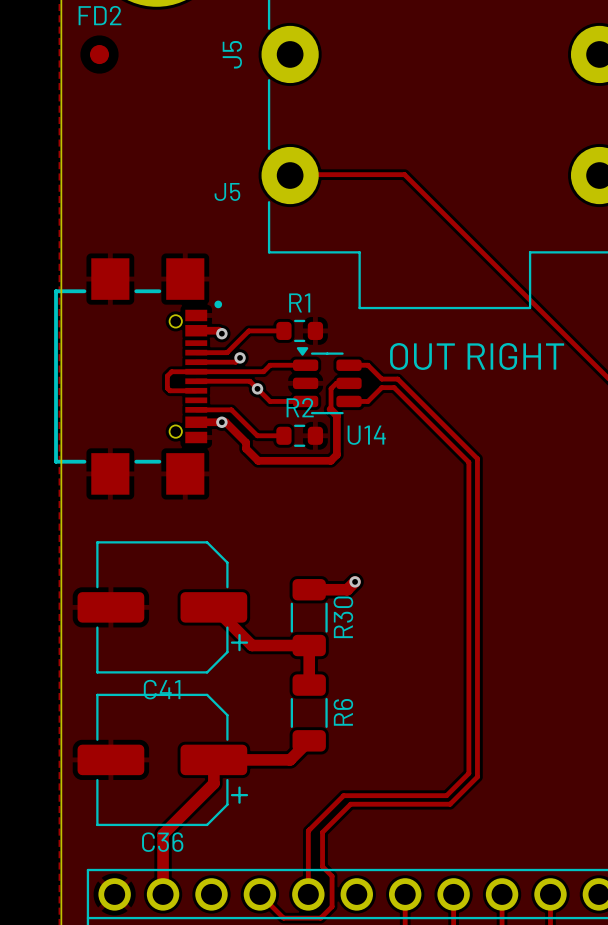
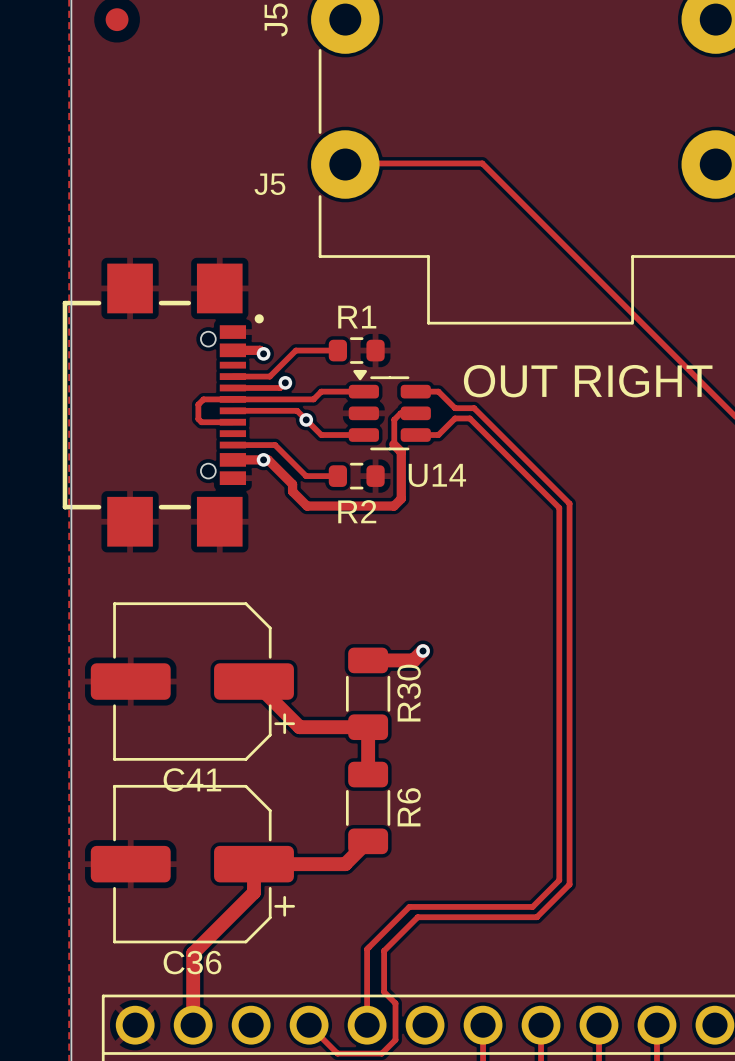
R2 name position: R2 (300, 407) -> R2 (357, 511)

